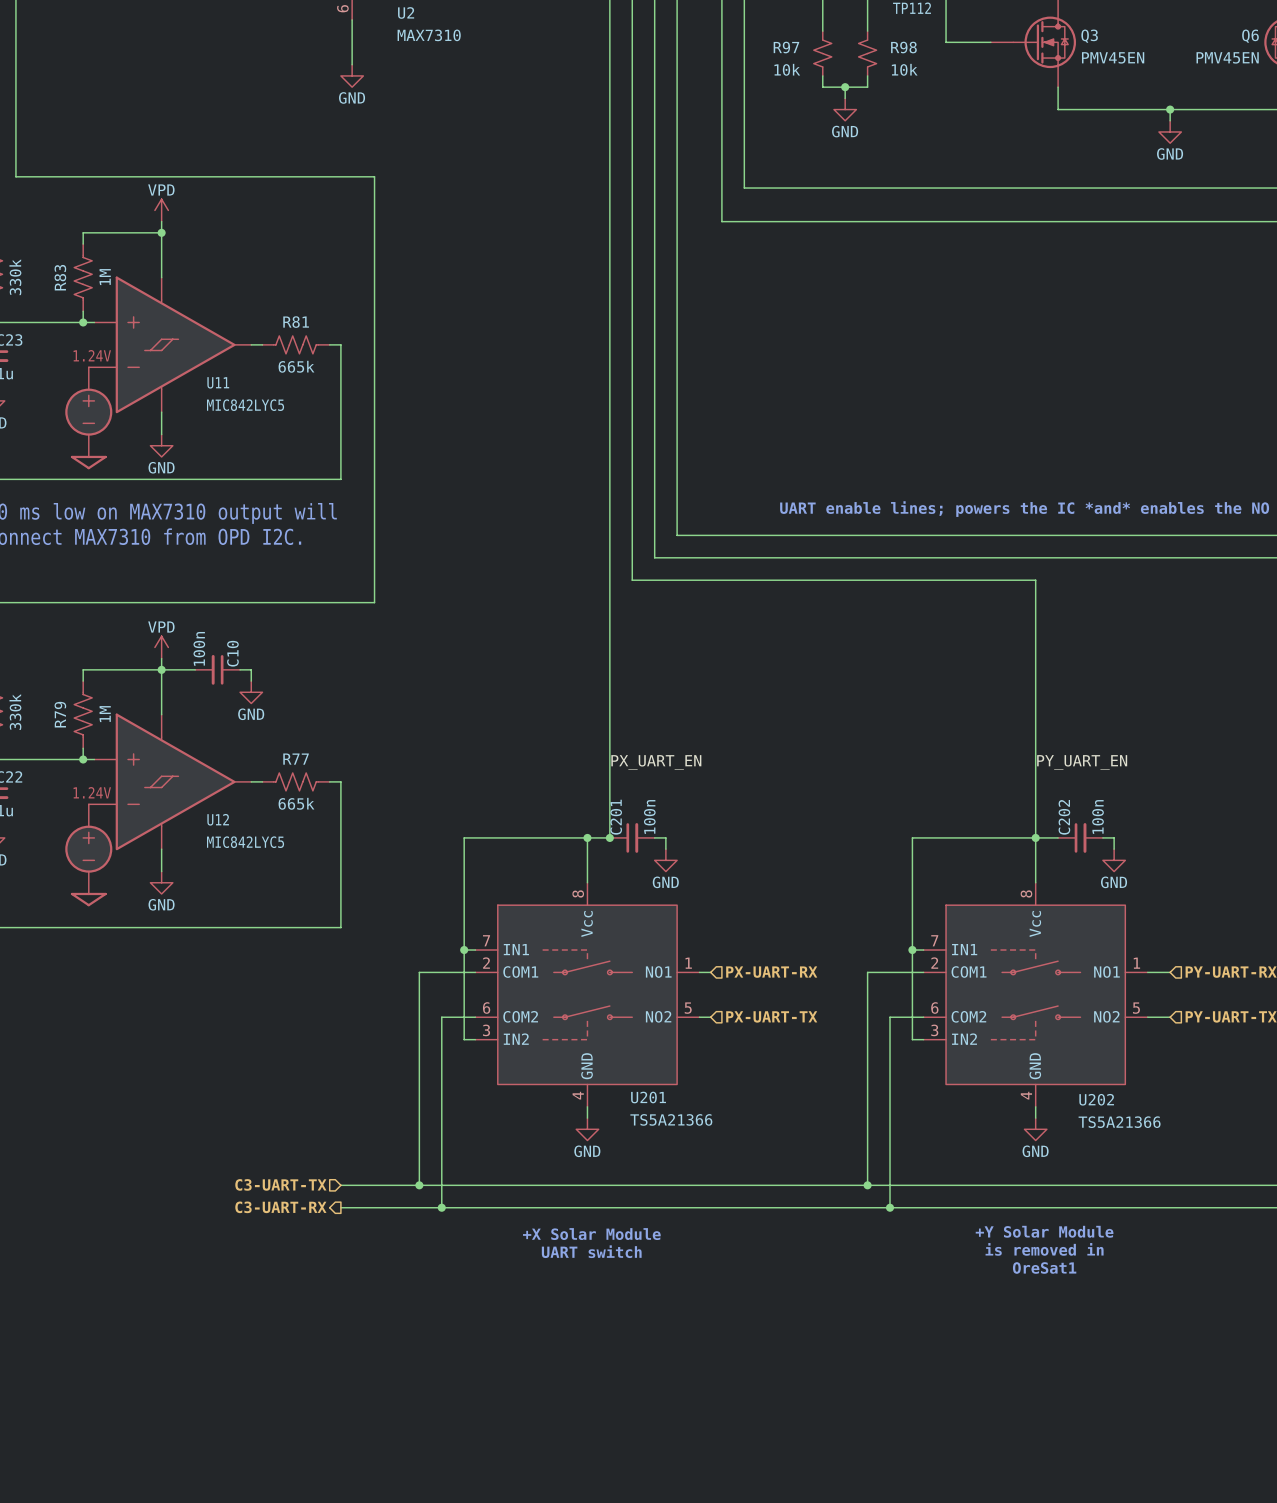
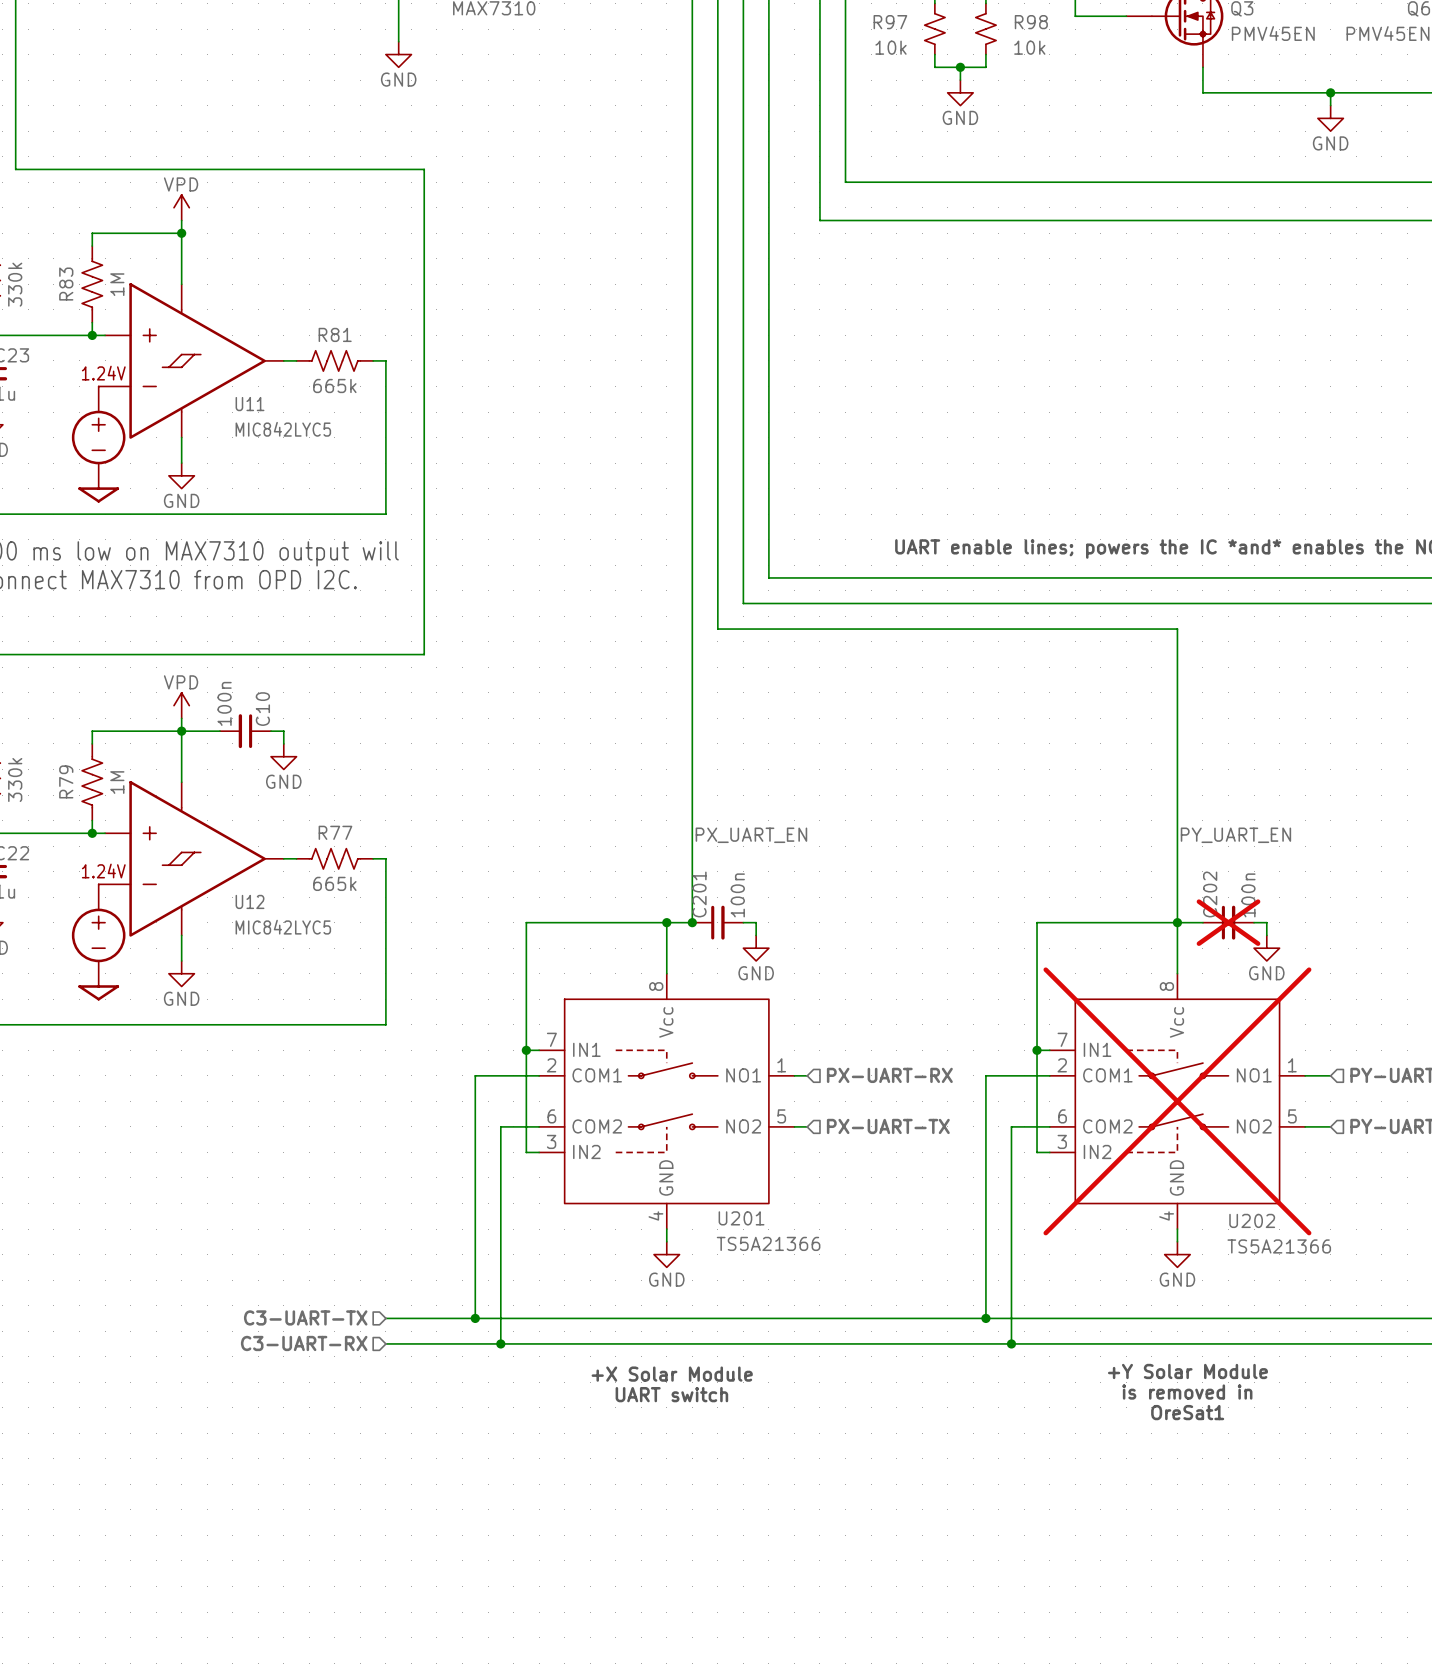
C202 do-not-place cross: none -> (1228, 922)
U202 do-not-place cross: none -> (1177, 1101)
hierarchical label shape: output (280, 1207) -> input (304, 1343)

